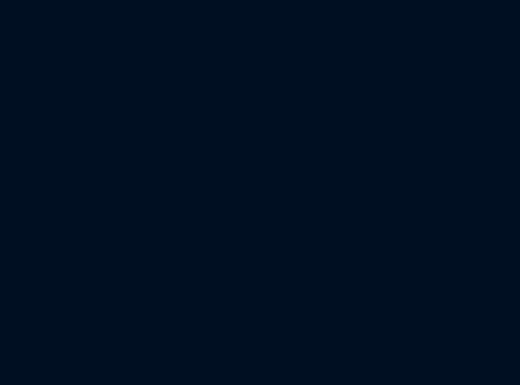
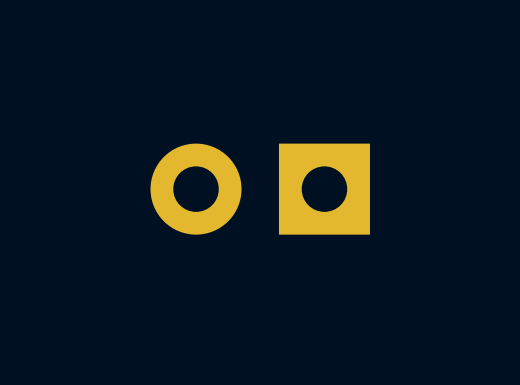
part: none -> (260, 189)

